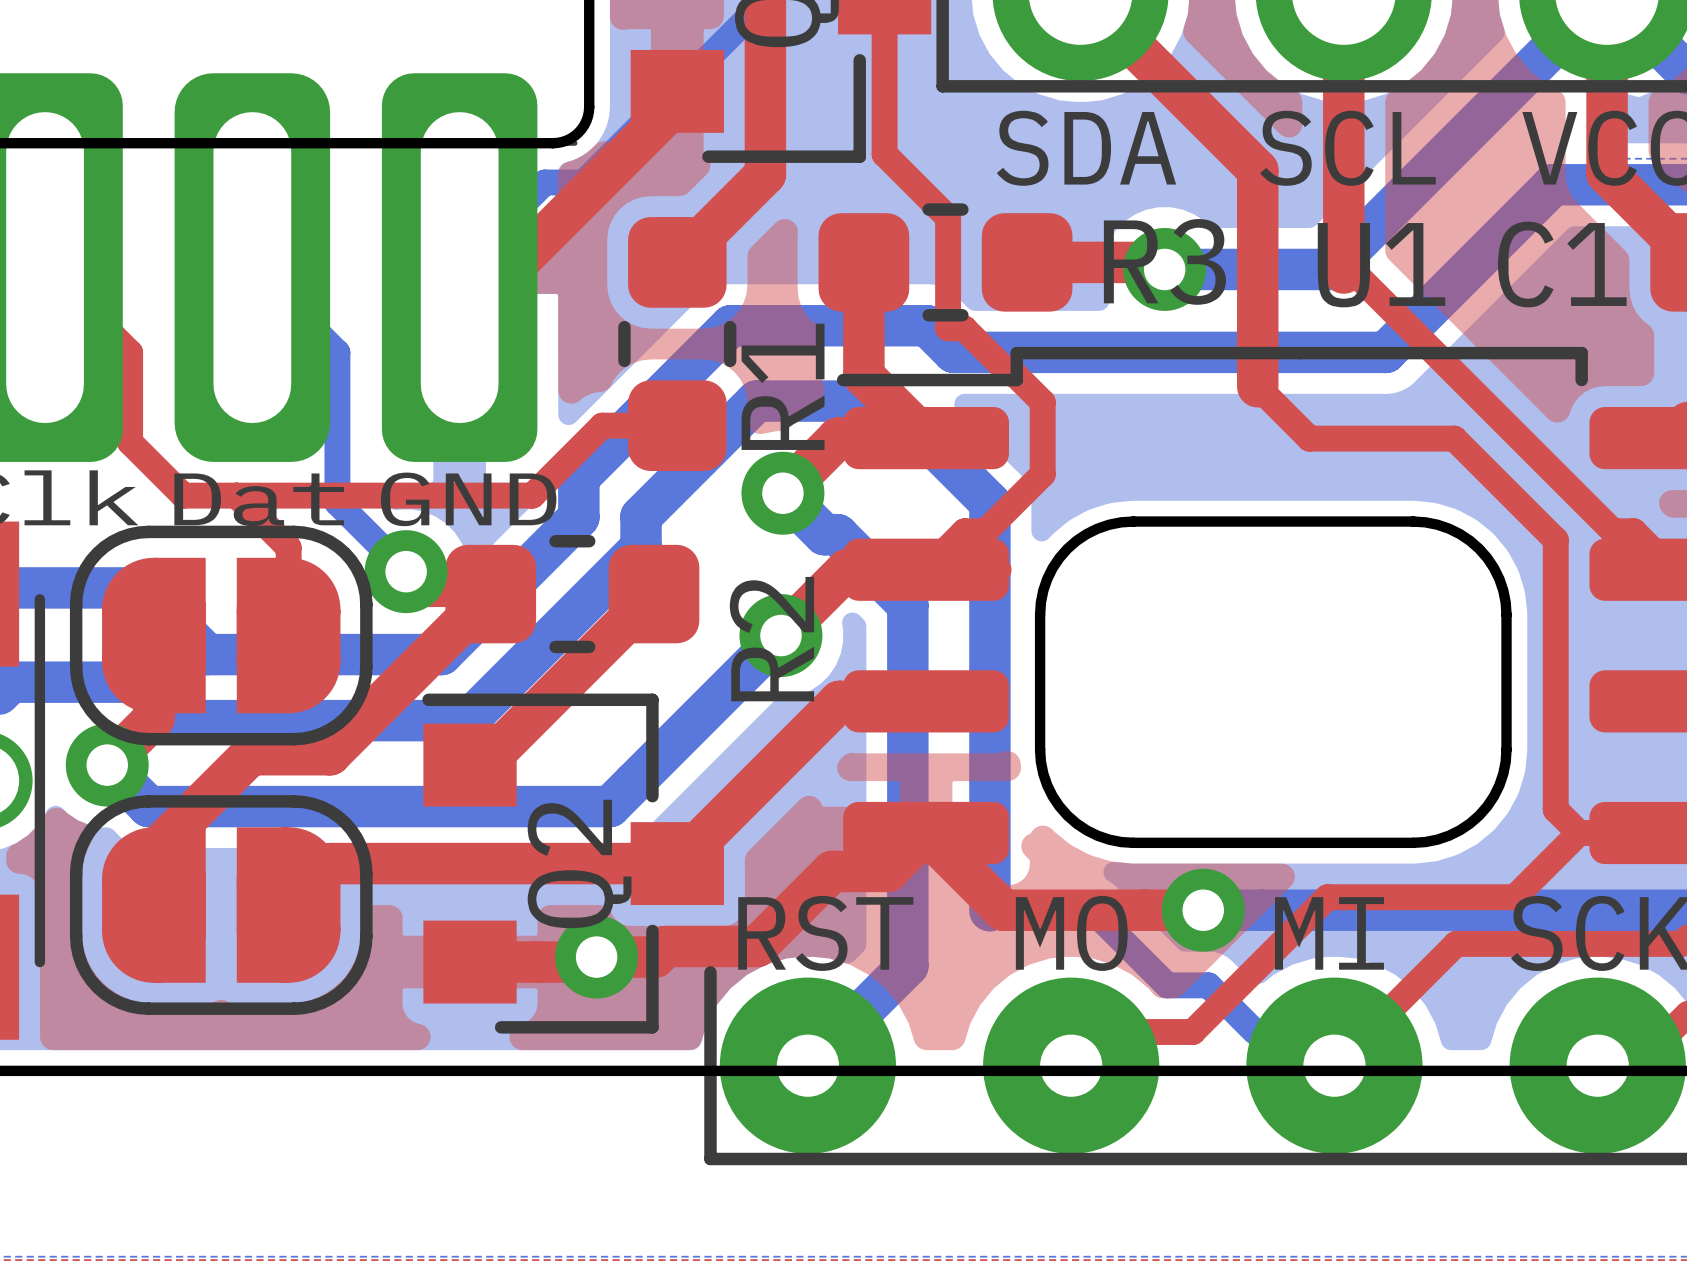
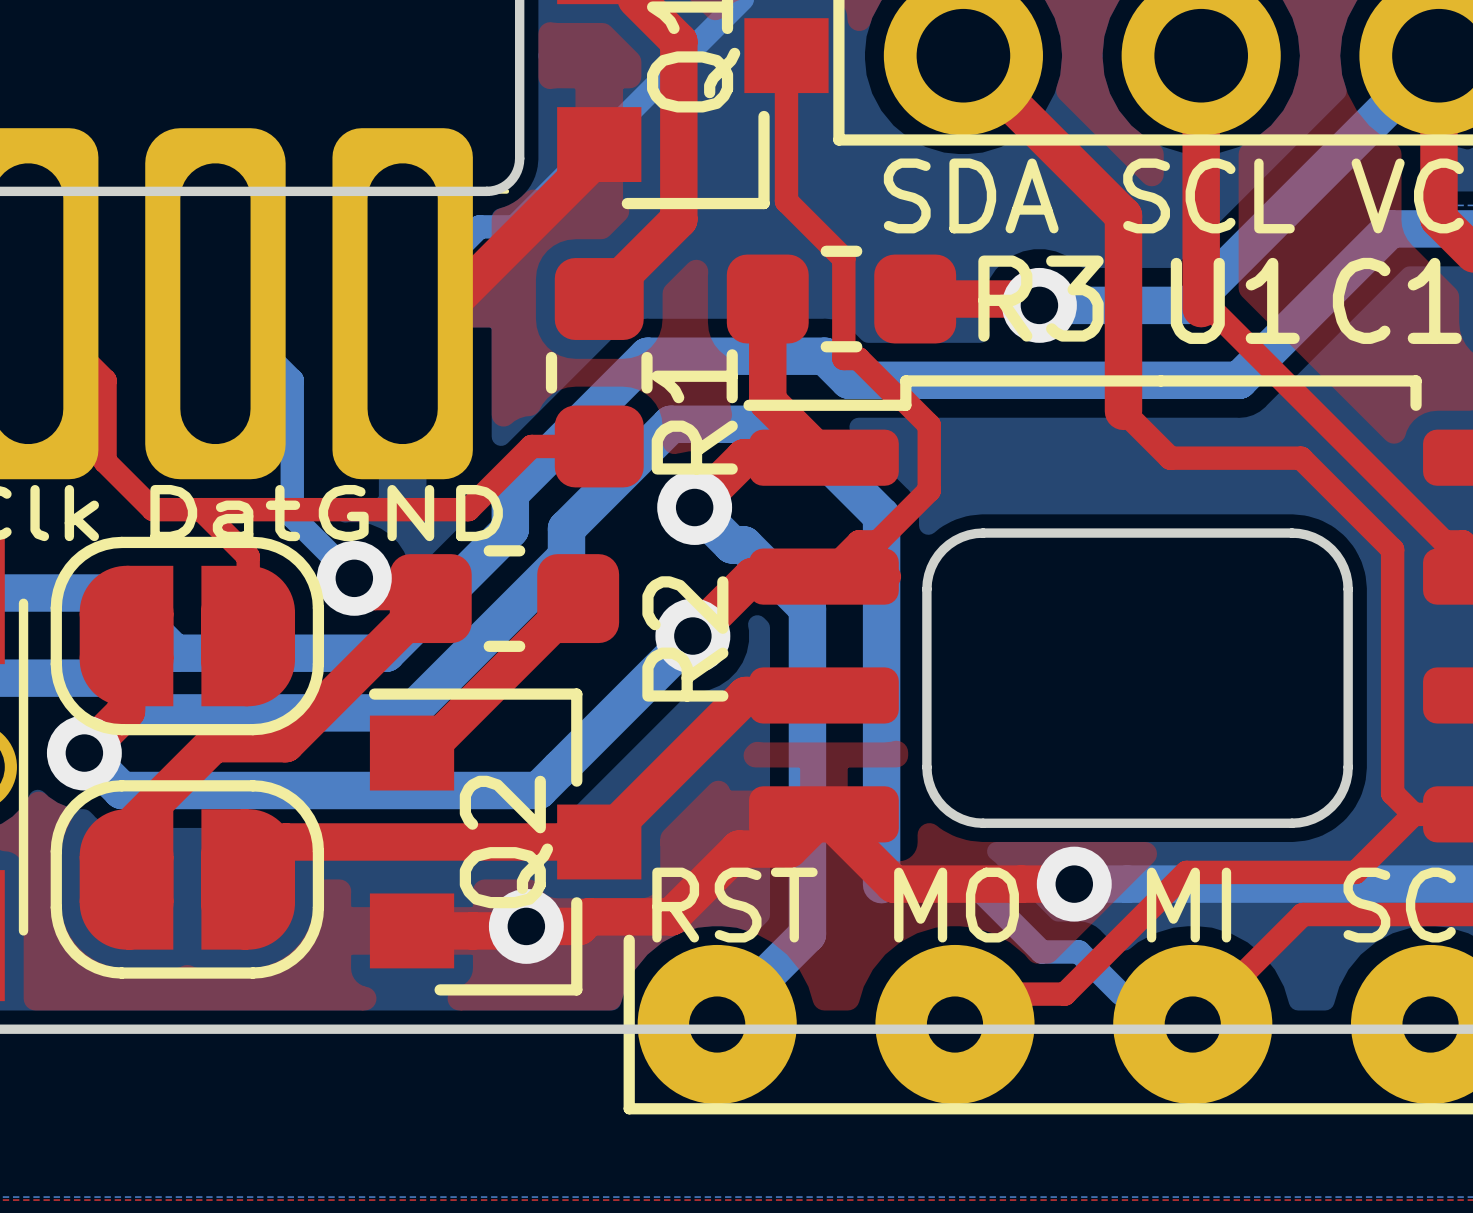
board edge: (1133, 521) (1121, 522) (1097, 528) (1076, 540) (1067, 548) (1059, 558) (1047, 579) (1043, 590) (1040, 614) -> (1011, 533) (968, 534) (954, 540) (943, 549) (934, 561) (928, 574) (926, 617)
board edge: (1413, 521) (1425, 522) (1448, 528) (1470, 540) (1479, 548) (1487, 558) (1499, 579) (1503, 590) (1506, 614) -> (1263, 533) (1306, 534) (1320, 540) (1331, 549) (1340, 561) (1346, 574) (1348, 617)
board edge: (1040, 749) (1043, 773) (1047, 785) (1059, 806) (1067, 815) (1076, 823) (1097, 835) (1109, 839) (1133, 842) -> (926, 739) (928, 781) (934, 795) (943, 806) (954, 815) (968, 821) (1011, 823)
board edge: (1506, 749) (1503, 773) (1499, 785) (1487, 806) (1479, 815) (1470, 823) (1448, 835) (1437, 839) (1413, 842) -> (1348, 739) (1346, 781) (1340, 795) (1331, 806) (1320, 815) (1306, 821) (1263, 823)

